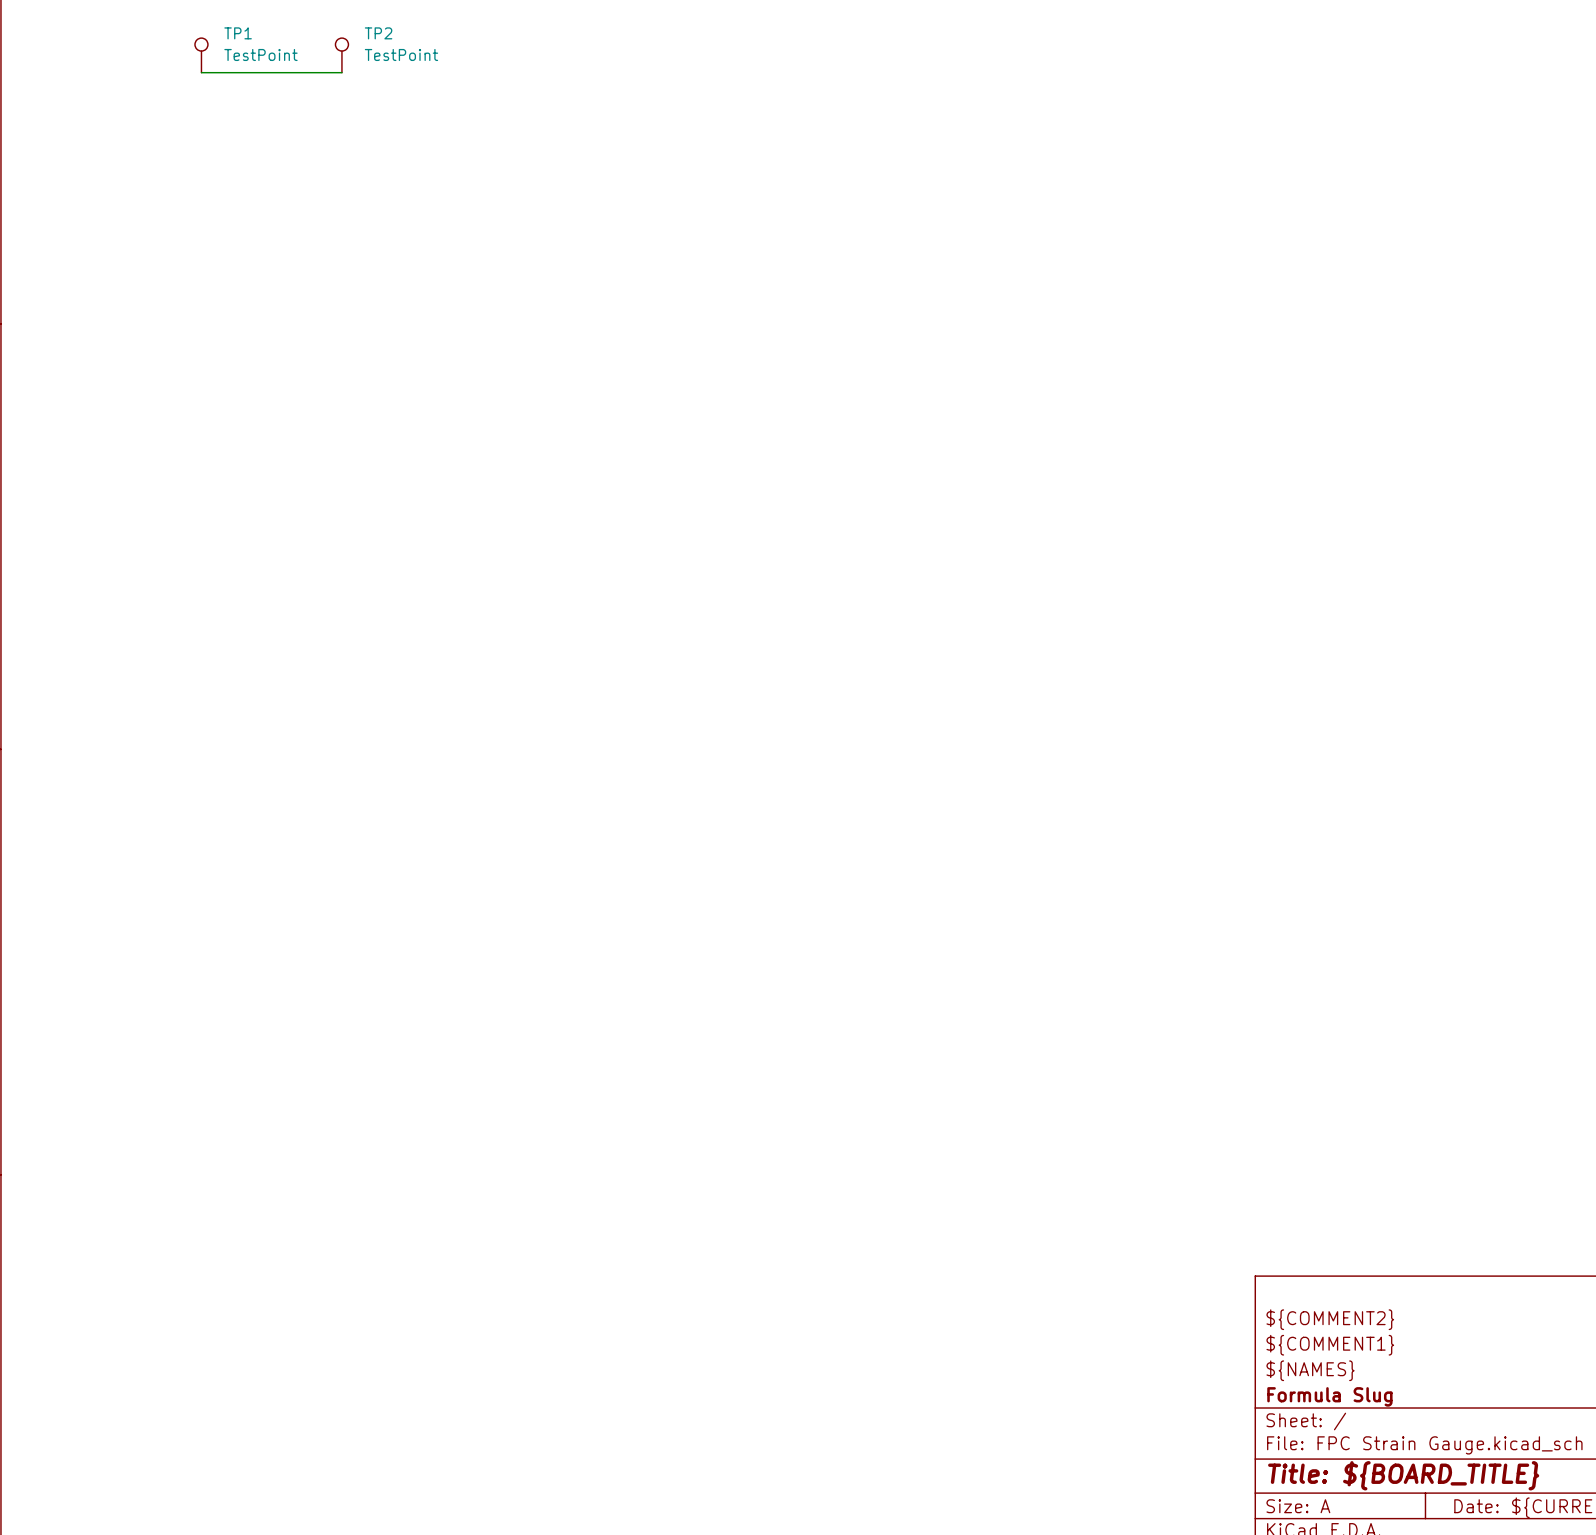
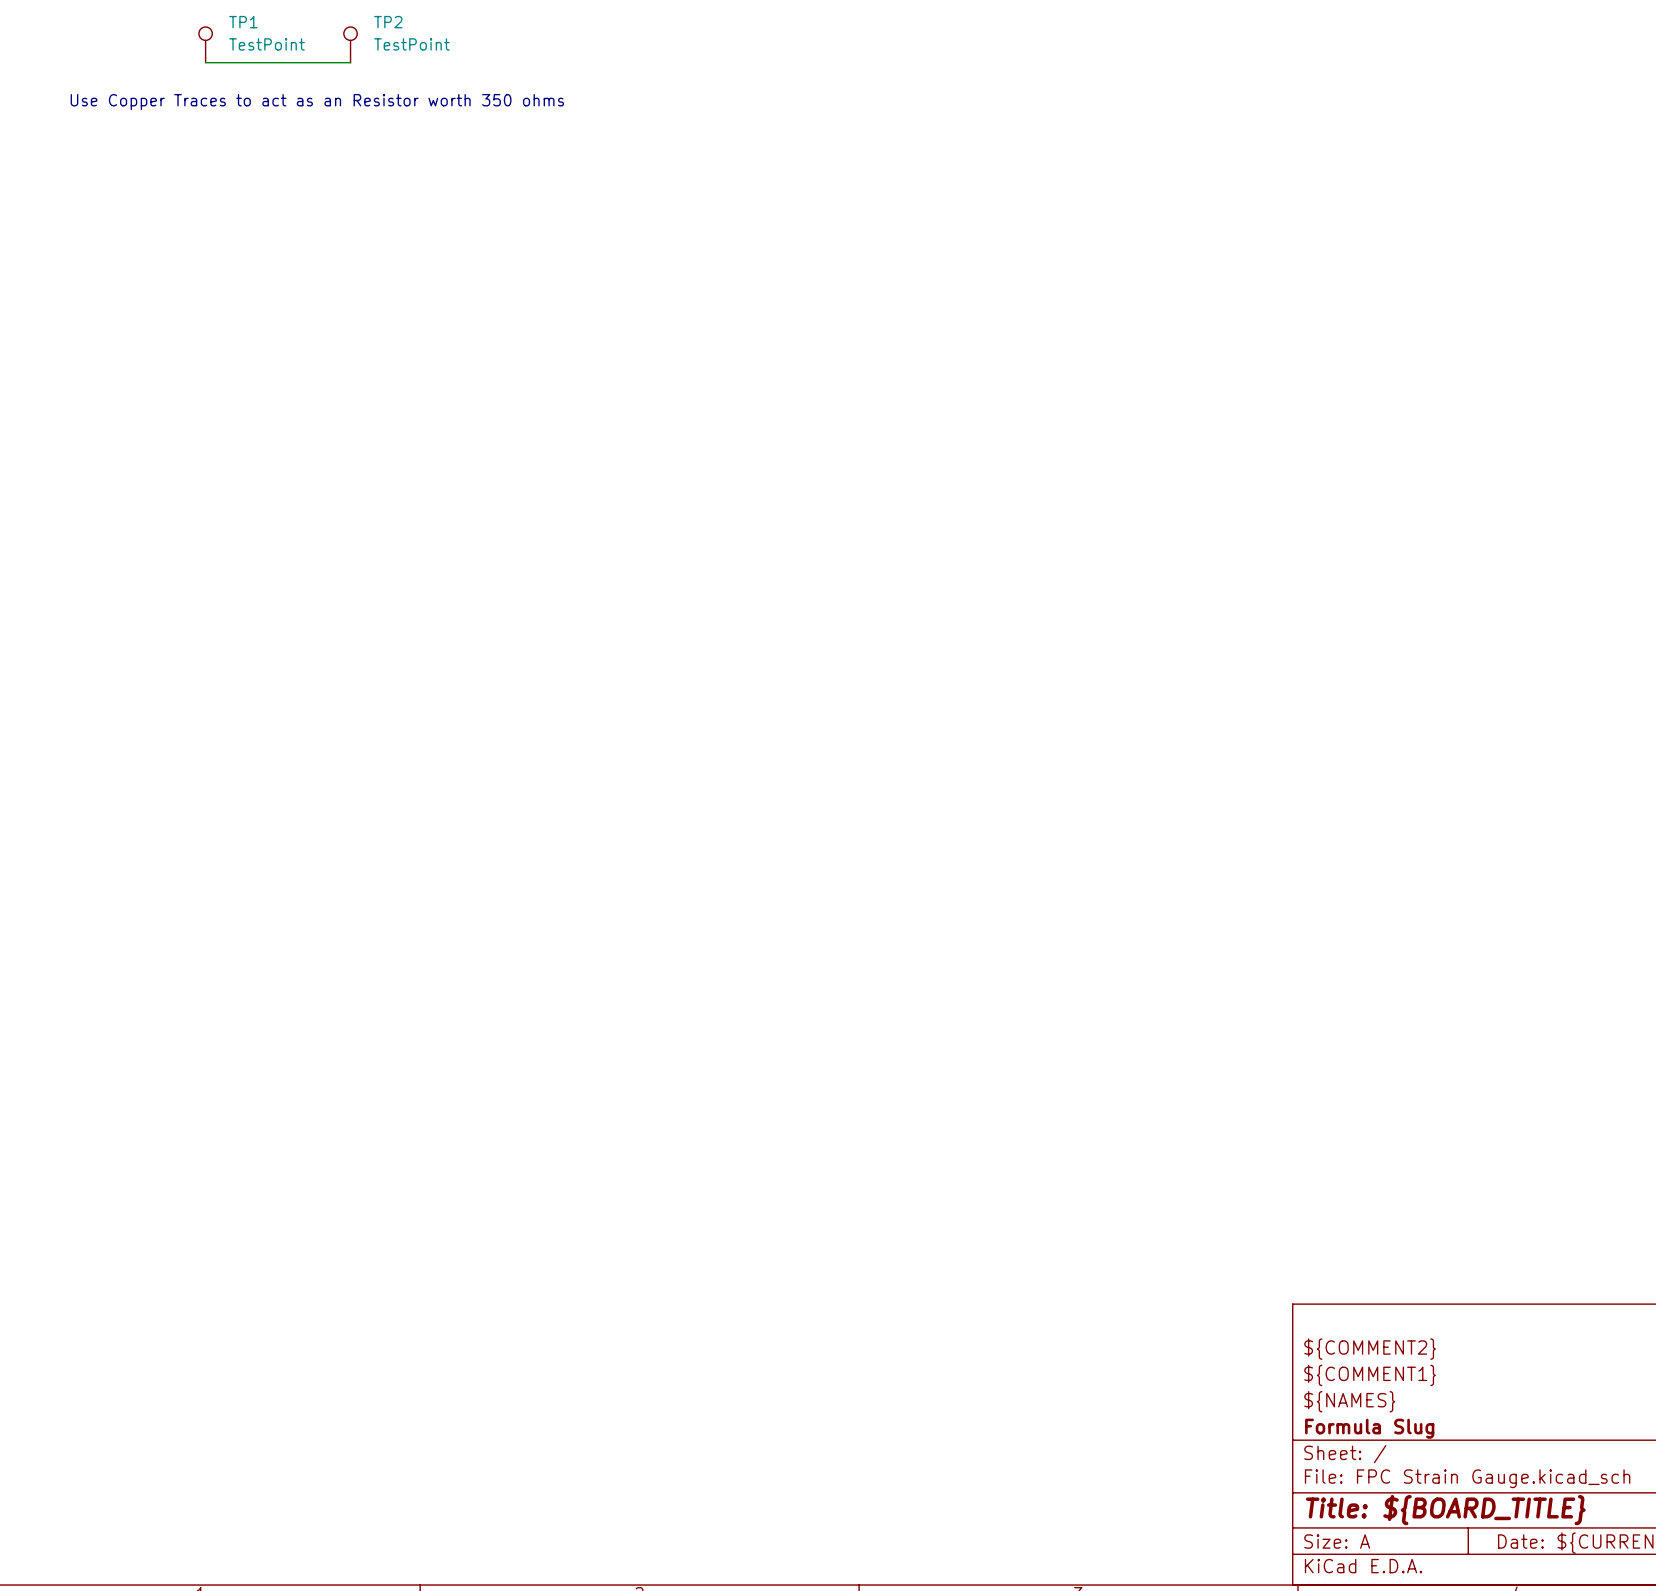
text: none -> Use Copper Traces to act as an Resistor worth 350 ohms (317, 102)

